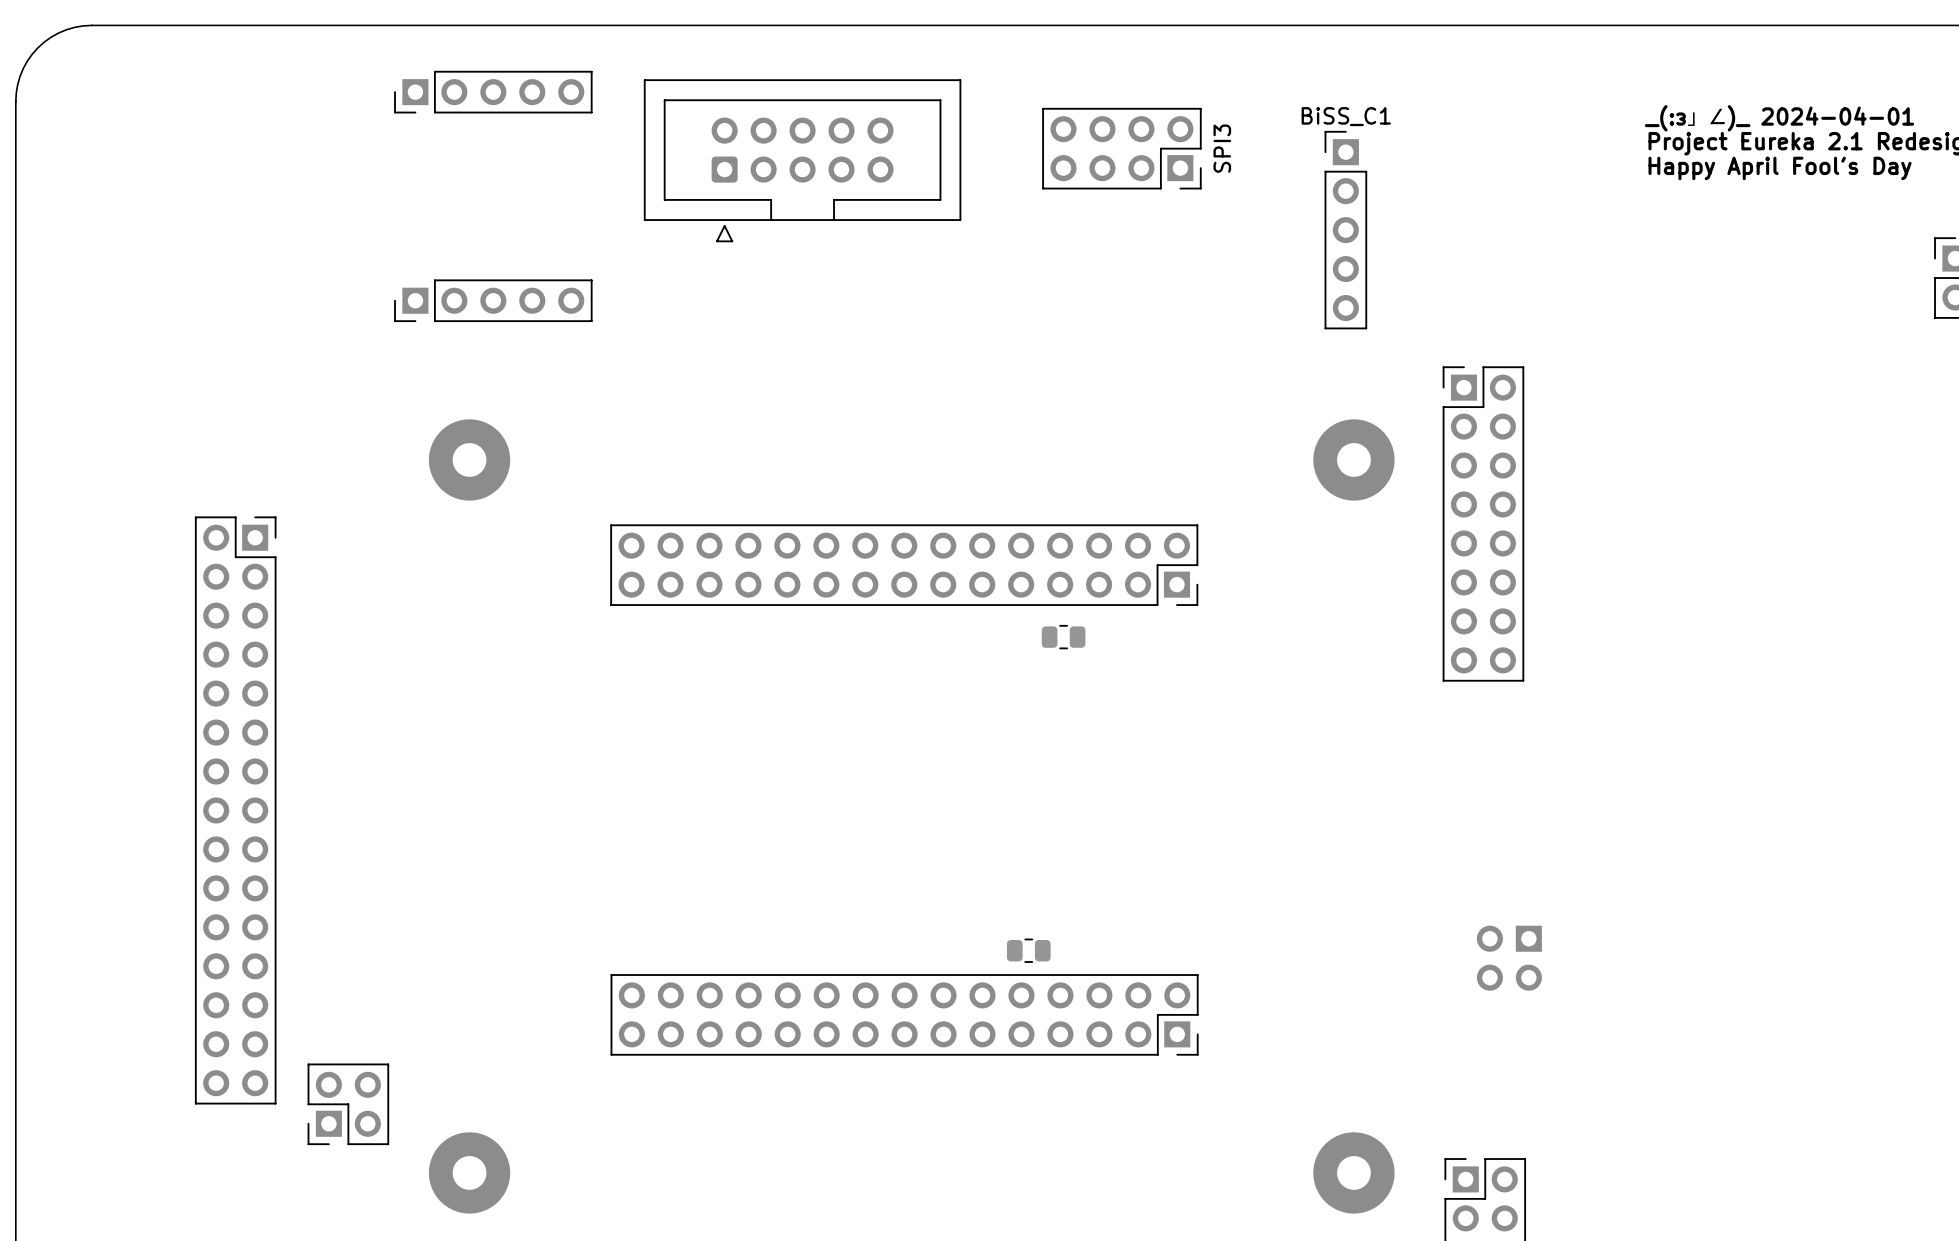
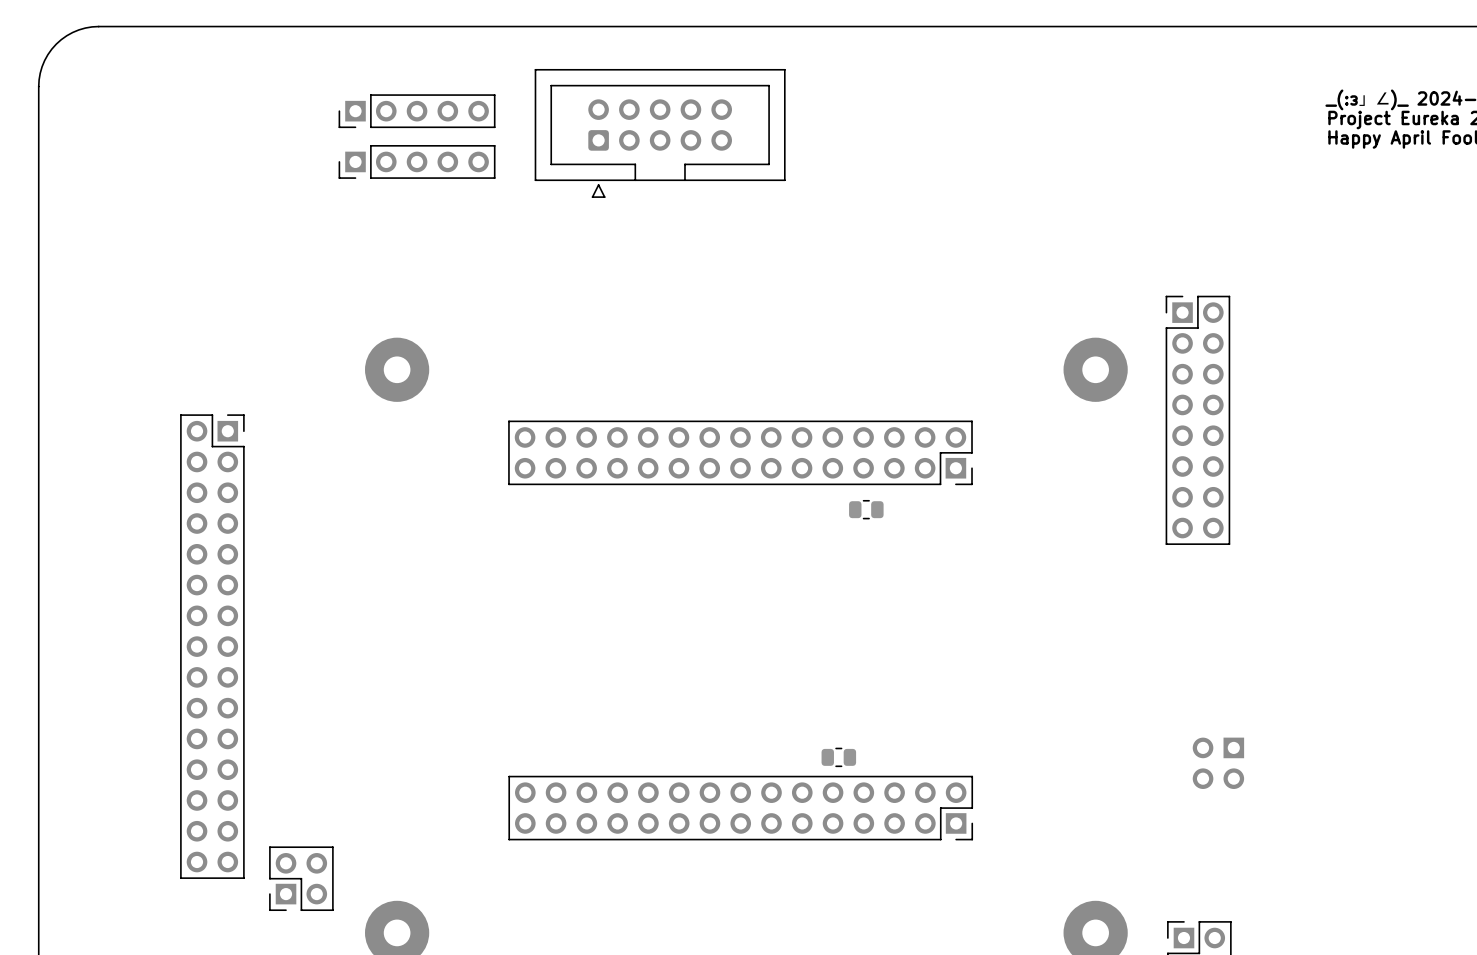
part position: (493, 92) -> (417, 111)
SPI3: (1121, 148) -> none
part: none -> (417, 161)
BiSS_C1: (1345, 230) -> none
part: (493, 300) -> none

